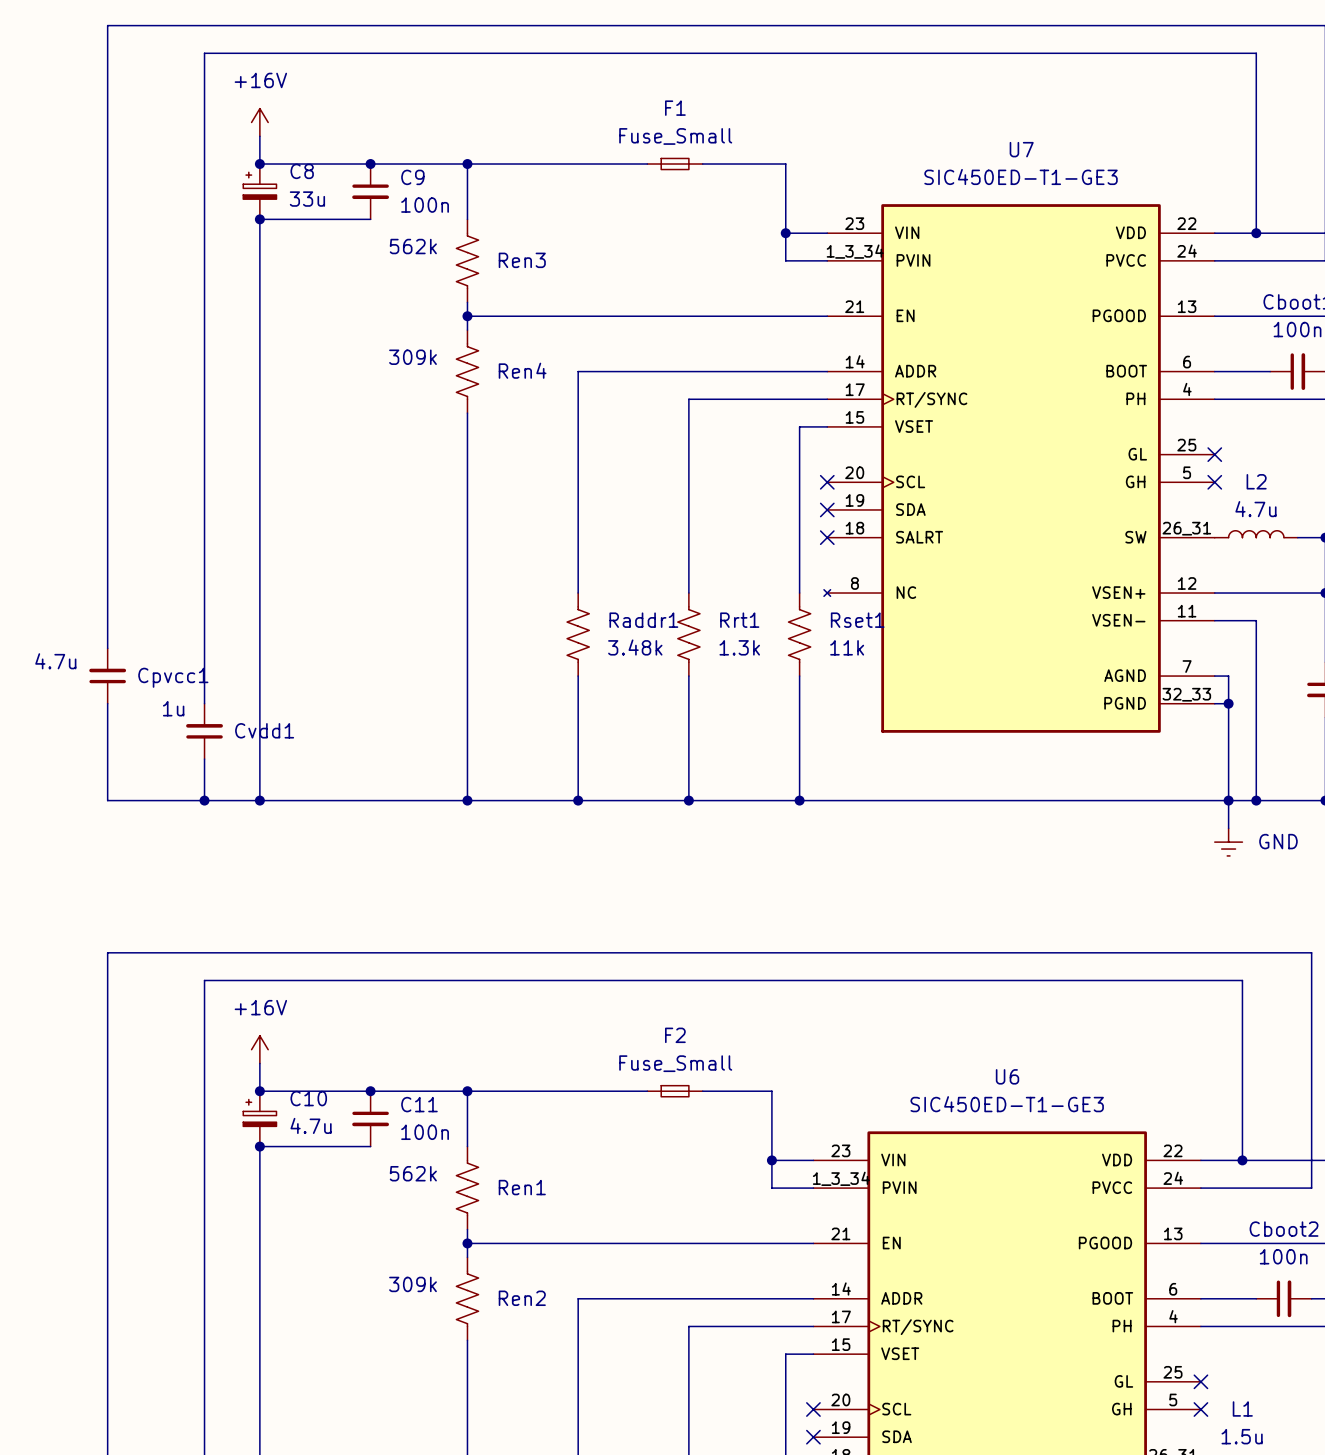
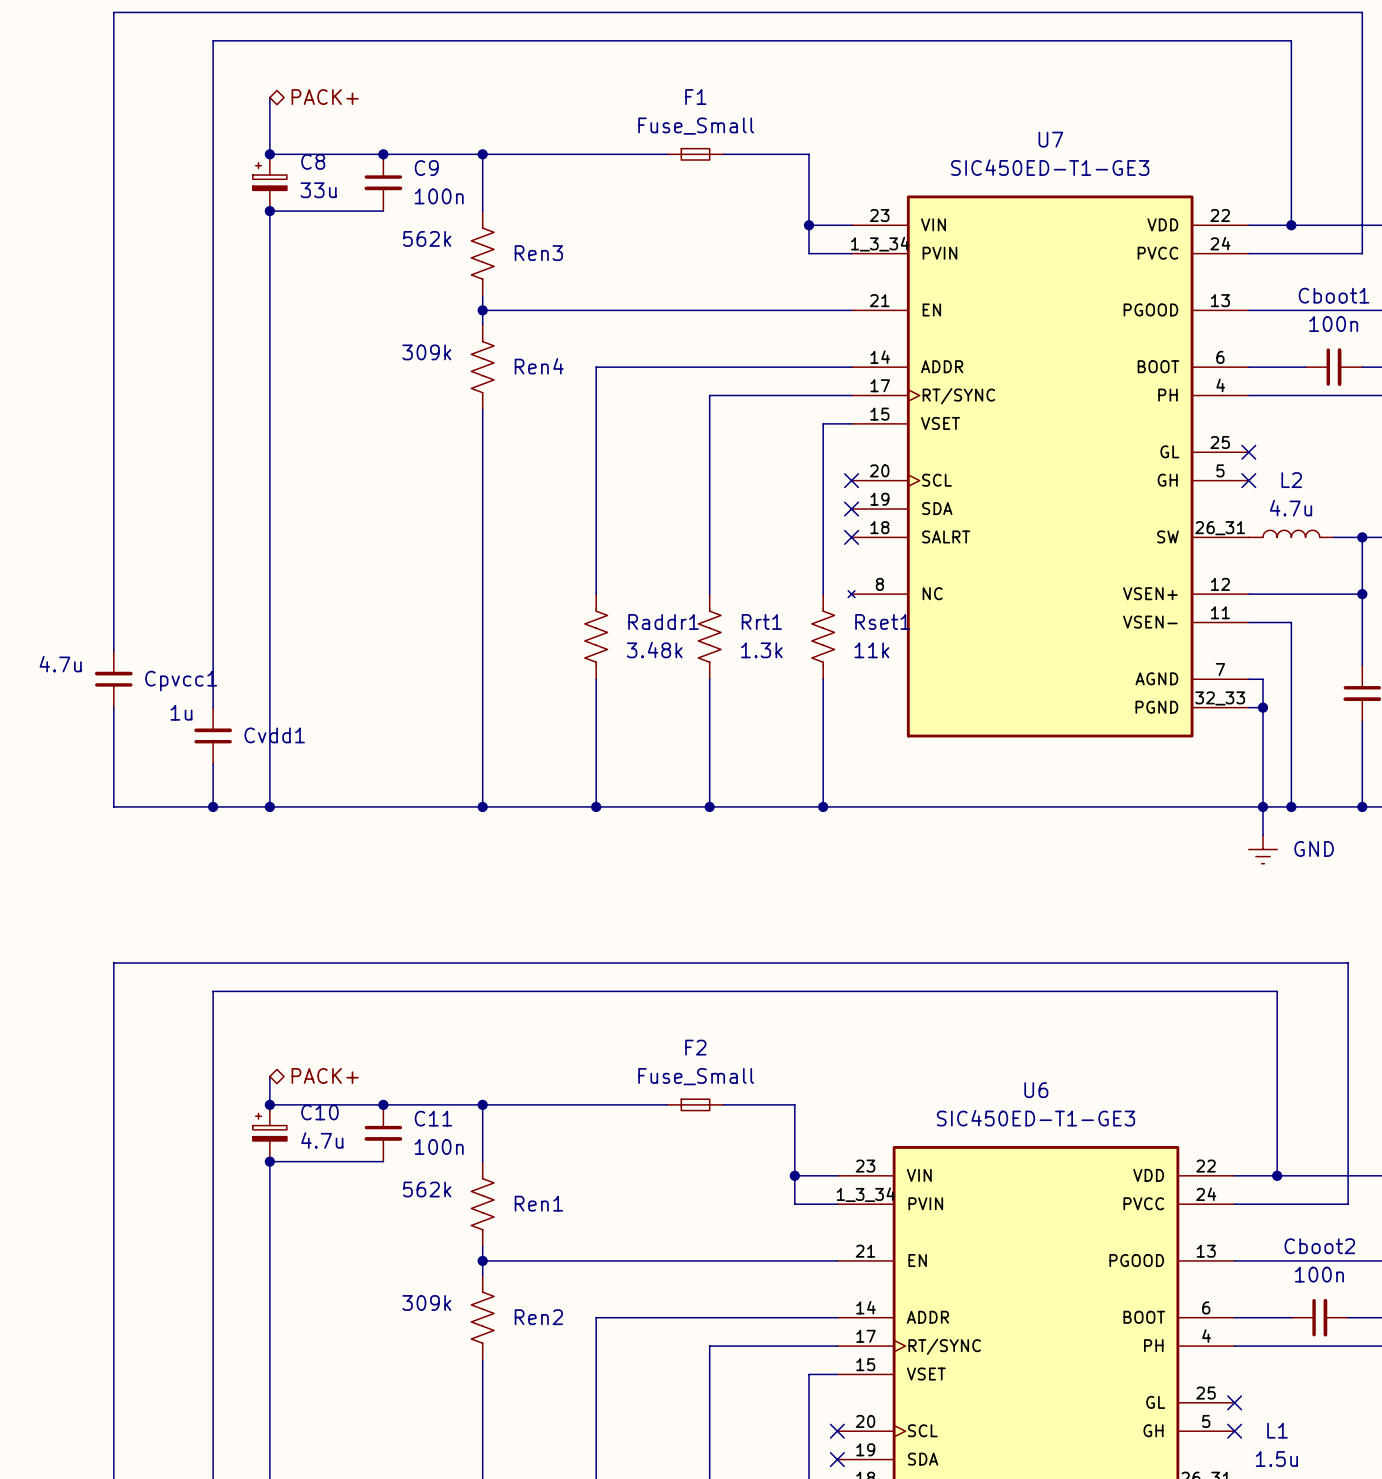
hierarchical label: none -> PACK+ (325, 97)
power symbol: +16V (259, 122) -> none
power symbol: +16V (259, 1049) -> none
hierarchical label: none -> PACK+ (325, 1075)

